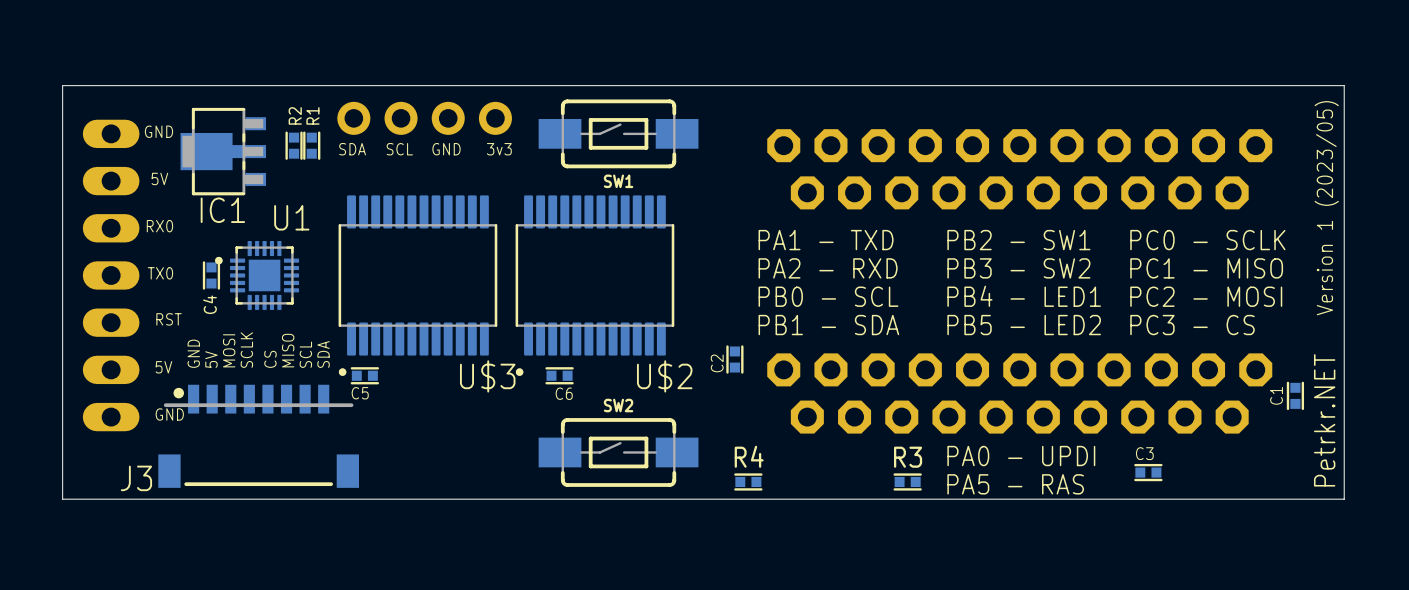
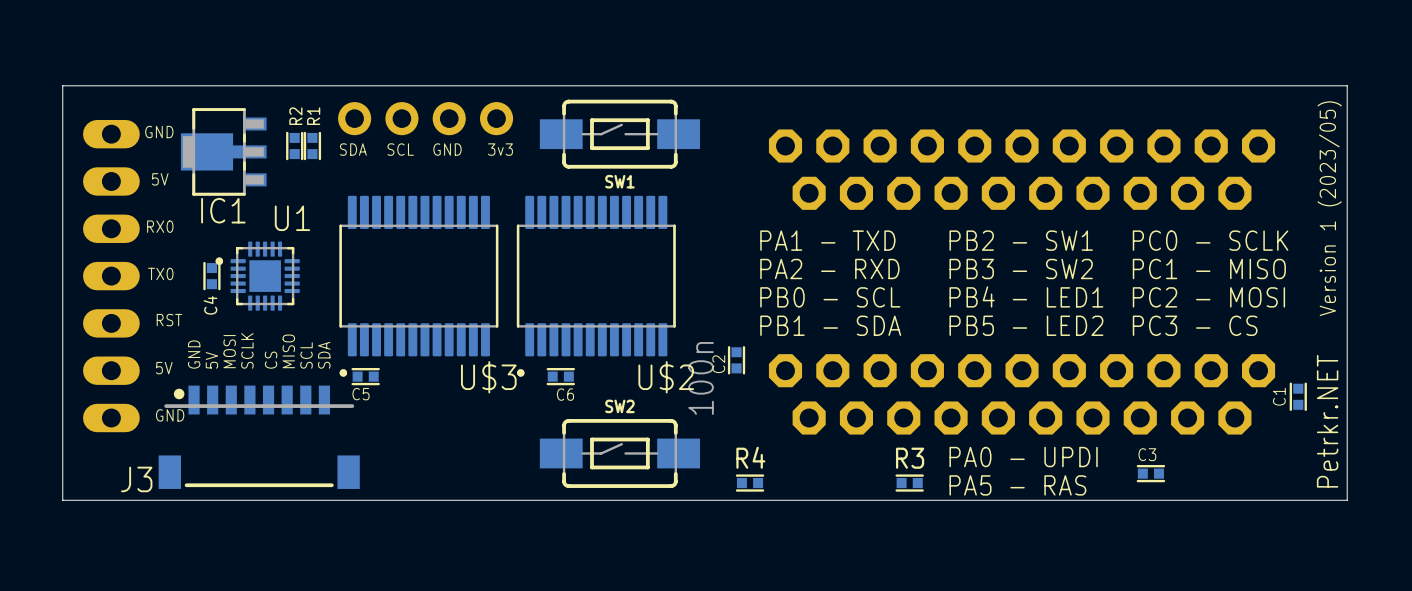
C2 value: none -> 100n (701, 378)

